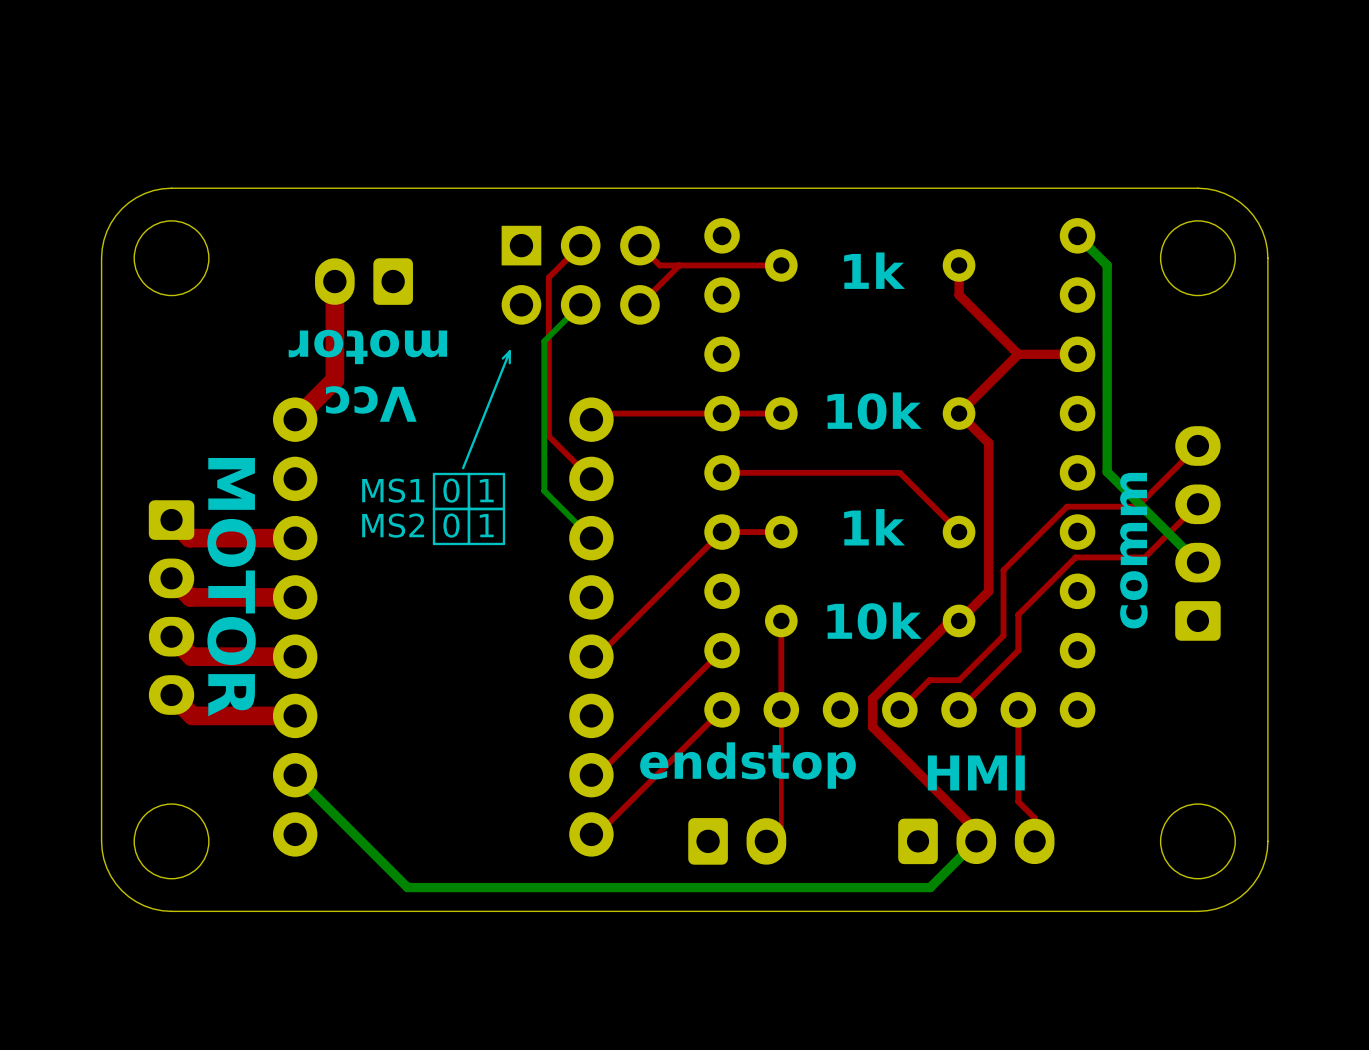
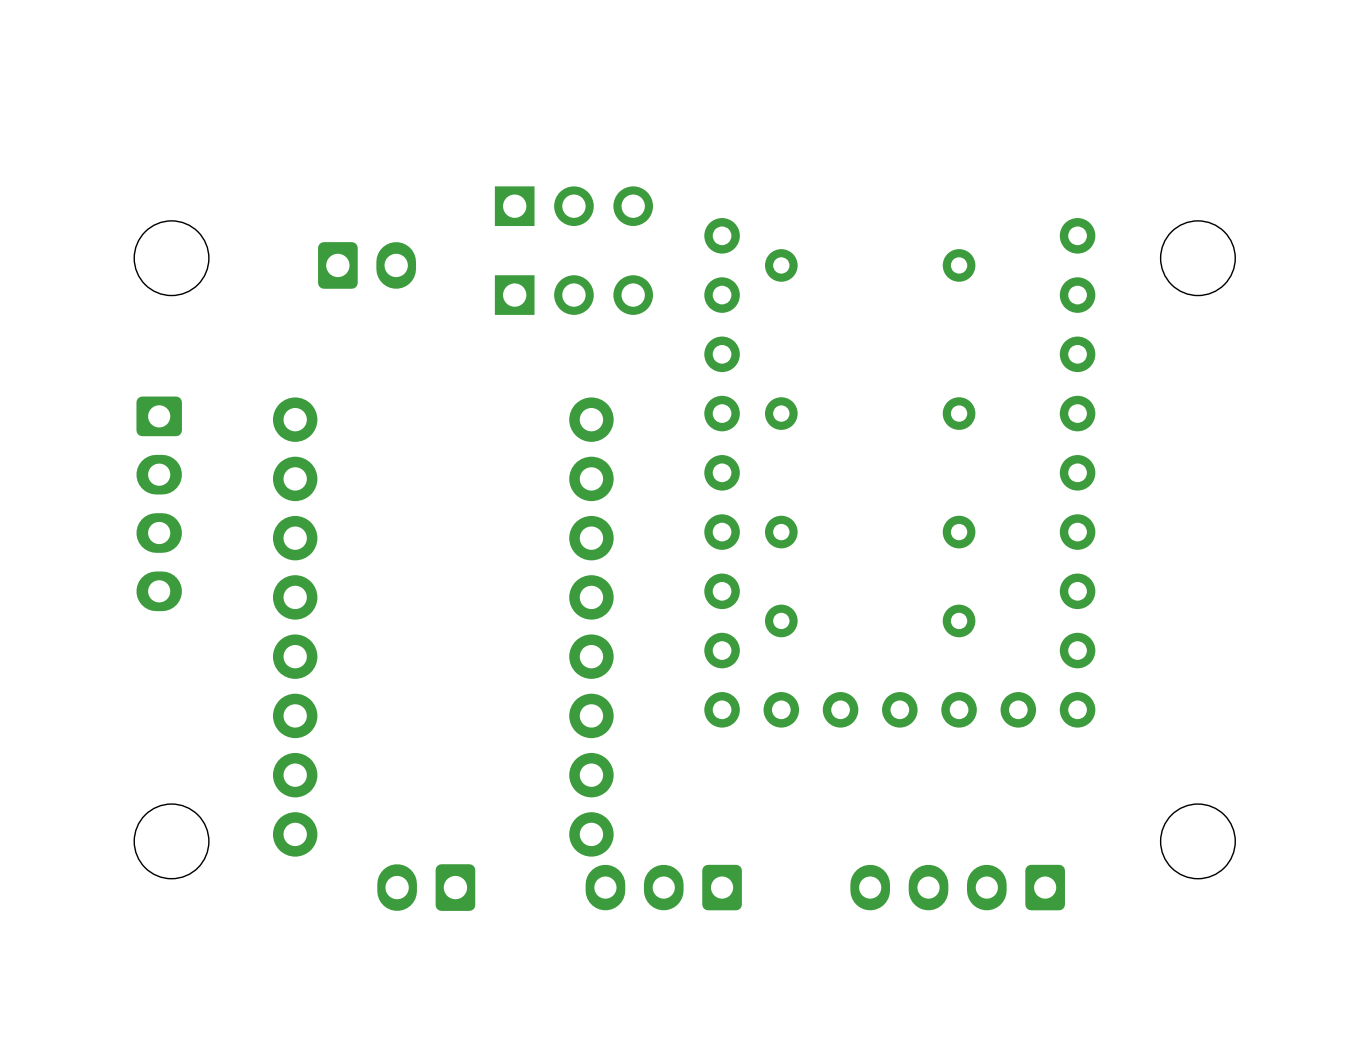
board edge: (1197, 188) (171, 188) (153, 190) (136, 197) (122, 208) (110, 223) (103, 240) (101, 258) (101, 841) (103, 859) (110, 876) (122, 890) (136, 901) (153, 908) (171, 911) (1197, 911) (1216, 908) (1232, 901) (1247, 890) (1258, 876) (1265, 859) (1267, 841) (1267, 258) (1262, 231) (1247, 208) (1224, 193) (1197, 188) -> none
part: none -> (573, 206)
part footprint: [501, 225, 660, 325] -> [494, 275, 654, 315]
bottom track: (1077, 235) (1107, 265) (1107, 471) (1197, 562) -> none
top track: (580, 245) (548, 277) (548, 436) (591, 478) -> none
top track: (639, 245) (659, 265) (781, 265) -> none
top track: (679, 265) (639, 304) -> none
top track: (959, 265) (959, 295) (1018, 354) -> none
text: 1k (874, 270) -> none
top track: (334, 281) (334, 380) (295, 419) -> none
part rotation: 0° (364, 281) -> 180° (367, 265)
bottom track: (580, 304) (544, 341) (544, 491) (591, 538) -> none
text: motor (367, 347) -> none
line: (509, 351) (463, 468) -> none
line: (509, 351) (509, 363) -> none
line: (509, 351) (502, 358) -> none
top track: (1018, 354) (959, 413) (988, 443) (988, 591) (959, 620) (950, 620) (872, 698) (872, 727) (976, 830) (976, 841) -> none
top track: (1077, 354) (1018, 354) -> none
text: Vcc (371, 403) -> none
text: 10k (874, 410) -> none
top track: (781, 413) (597, 413) (591, 419) -> none
top track: (1197, 445) (1137, 506) (1067, 506) (1003, 570) (1003, 635) (959, 680) (929, 680) (899, 709) -> none
top track: (722, 472) (899, 472) (959, 532) -> none
line: (468, 473) (468, 543) -> none
line: (503, 473) (503, 543) (433, 543) (433, 473) (503, 473) -> none
text: MS1 (393, 490) -> none
text: 0 (451, 490) -> none
text: 1 (486, 490) -> none
top track: (1197, 504) (1144, 557) (1075, 557) (1018, 614) (1018, 650) (959, 709) -> none
line: (503, 508) (433, 508) -> none
top track: (171, 520) (189, 538) (295, 538) -> none
text: MS2 (393, 525) -> none
text: 0 (451, 525) -> none
text: 1 (486, 525) -> none
text: 1k (874, 527) -> none
top track: (781, 532) (722, 532) (597, 656) (591, 656) -> none
part: (1197, 533) -> none
text: comm (1133, 550) -> none
top track: (171, 578) (190, 597) (295, 597) -> none
text: MOTOR (231, 587) -> none
part position: (171, 607) -> (159, 503)
top track: (781, 620) (781, 826) (766, 841) -> none
text: 10k (874, 620) -> none
top track: (171, 636) (191, 656) (295, 656) -> none
top track: (722, 650) (597, 775) (591, 775) -> none
top track: (171, 695) (192, 715) (295, 715) -> none
top track: (722, 709) (597, 834) (591, 834) -> none
top track: (1018, 709) (1018, 801) (1034, 818) (1034, 841) -> none
text: endstop (748, 765) -> none
text: HMI (976, 772) -> none
bottom track: (295, 775) (407, 887) (930, 887) (976, 841) -> none
part rotation: 0° (737, 841) -> 180° (426, 887)
part position: (737, 841) -> (426, 887)
part rotation: 0° (976, 841) -> 180° (663, 887)
part position: (976, 841) -> (663, 887)
part: none -> (957, 887)

